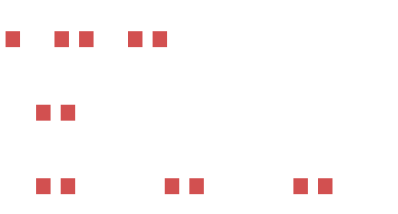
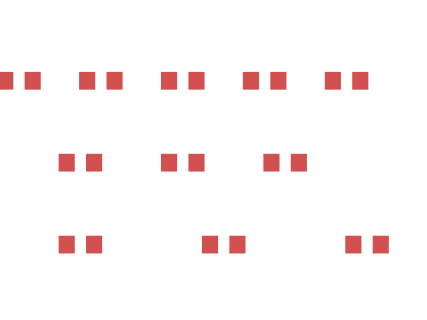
part: none -> (264, 80)
part: none -> (346, 80)
part: none -> (182, 162)
part: none -> (285, 162)

